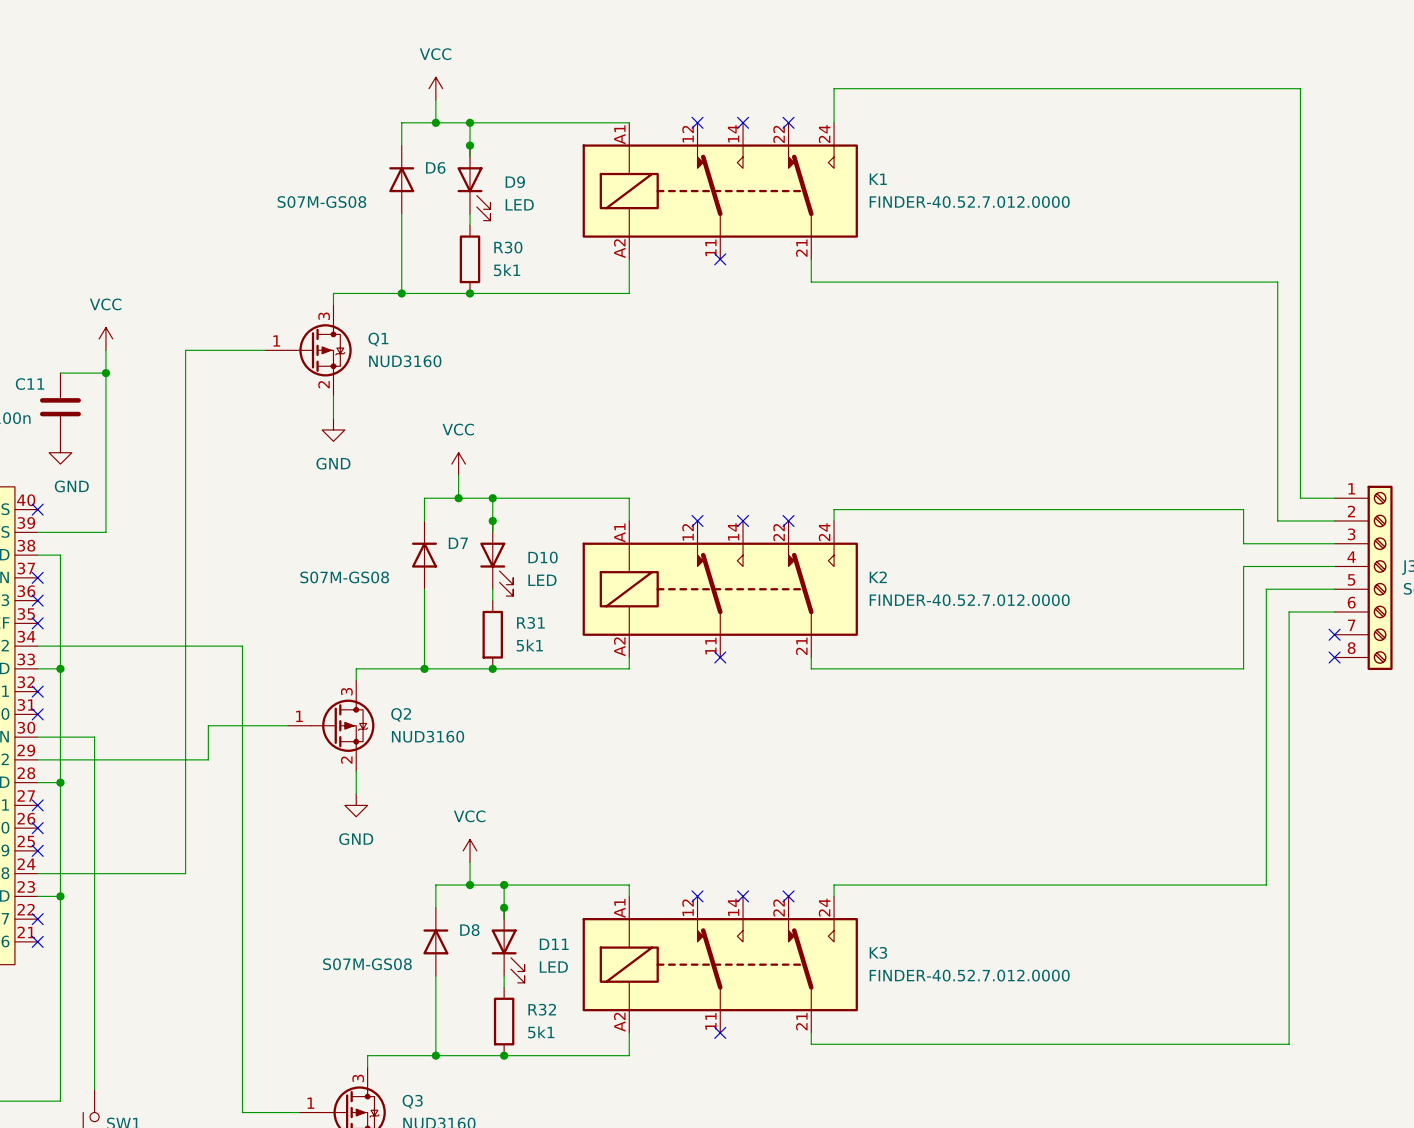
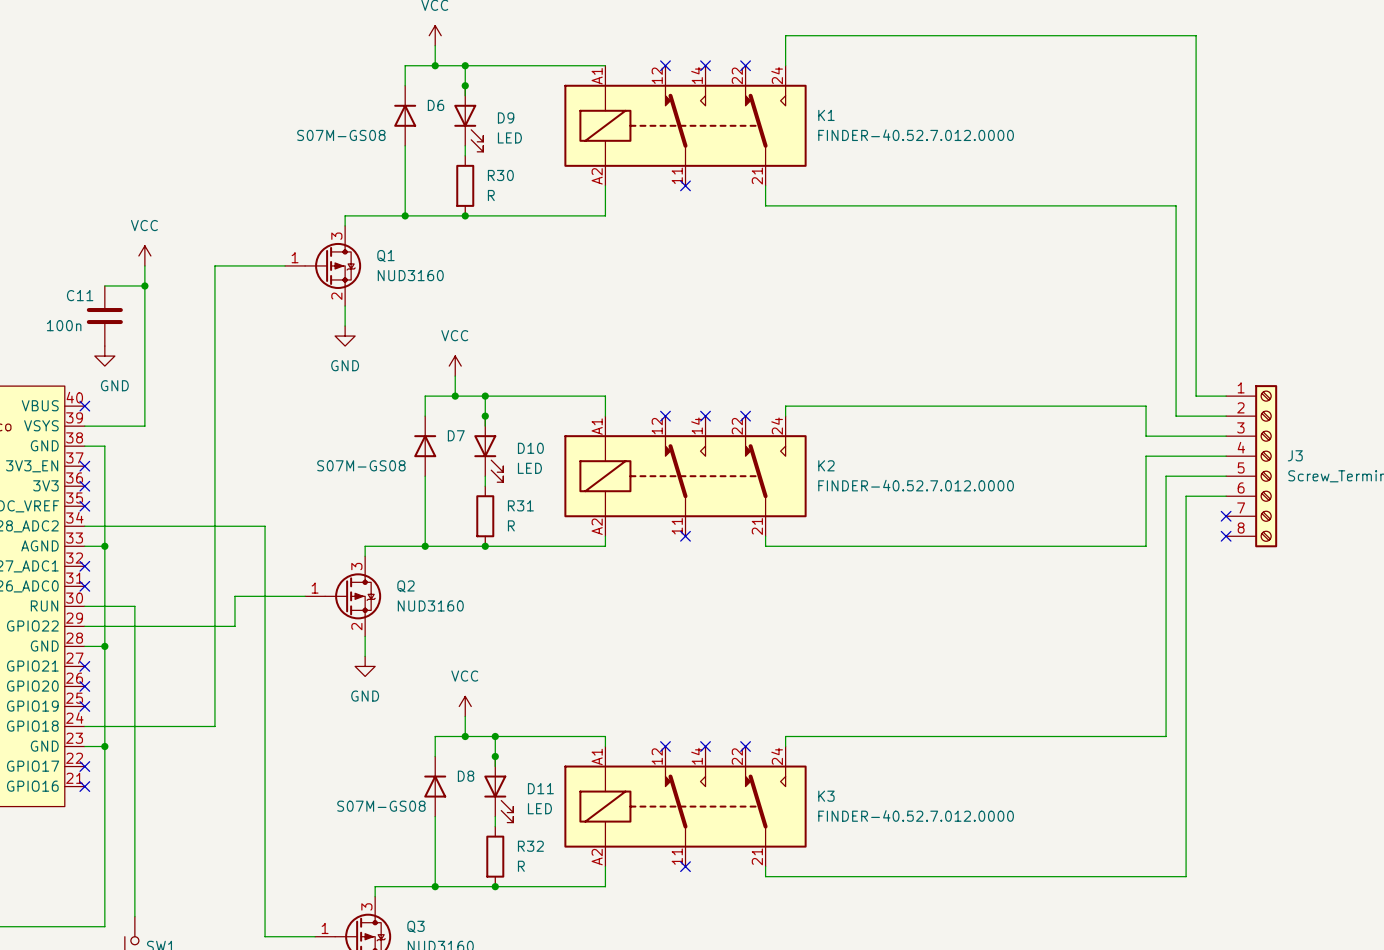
R30 value: 5k1 (507, 270) -> R (491, 195)
R31 value: 5k1 (529, 645) -> R (511, 525)
R32 value: 5k1 (541, 1032) -> R (521, 866)

